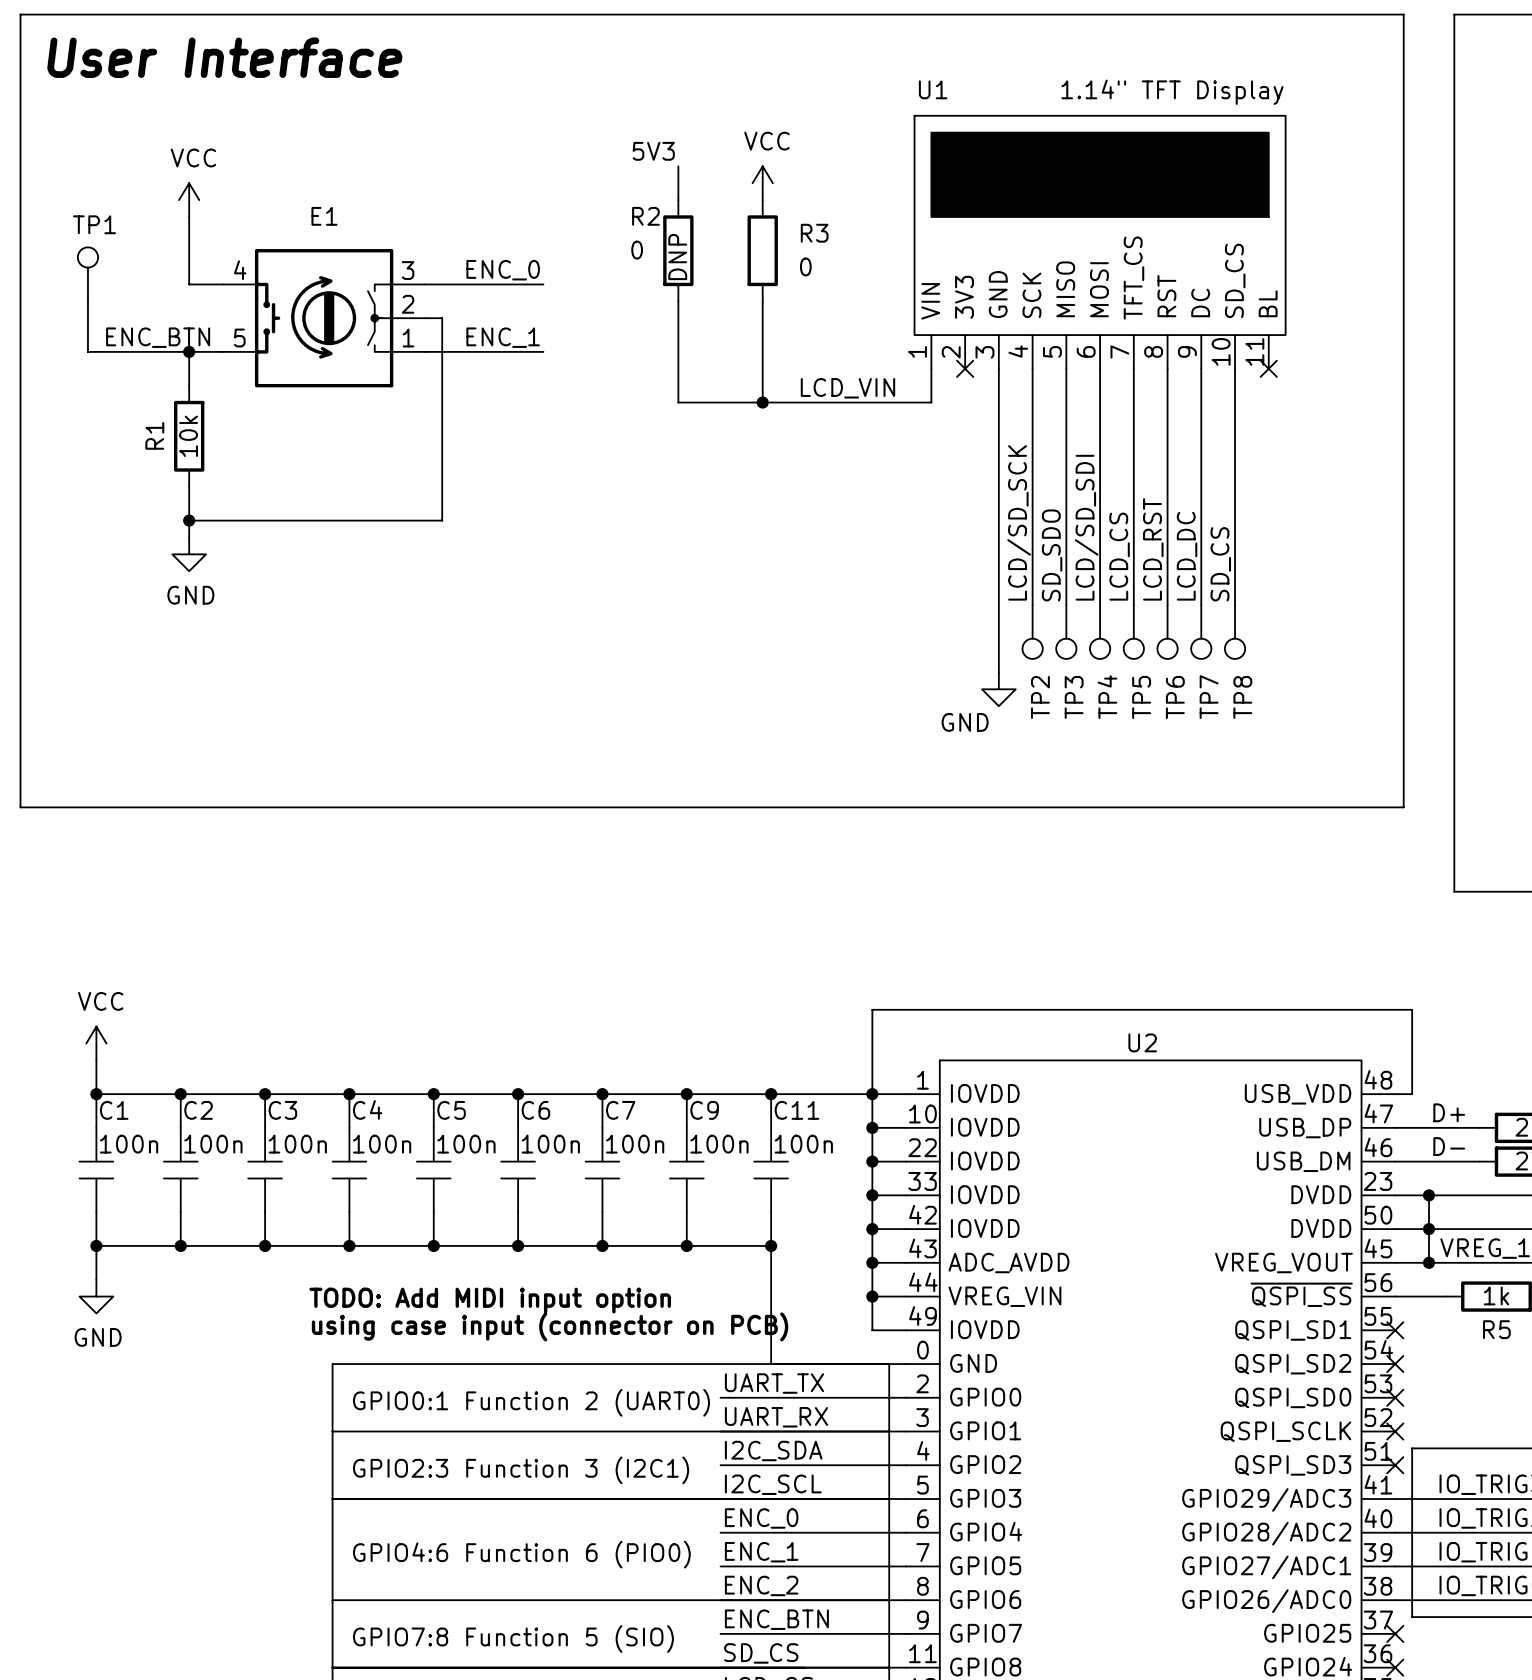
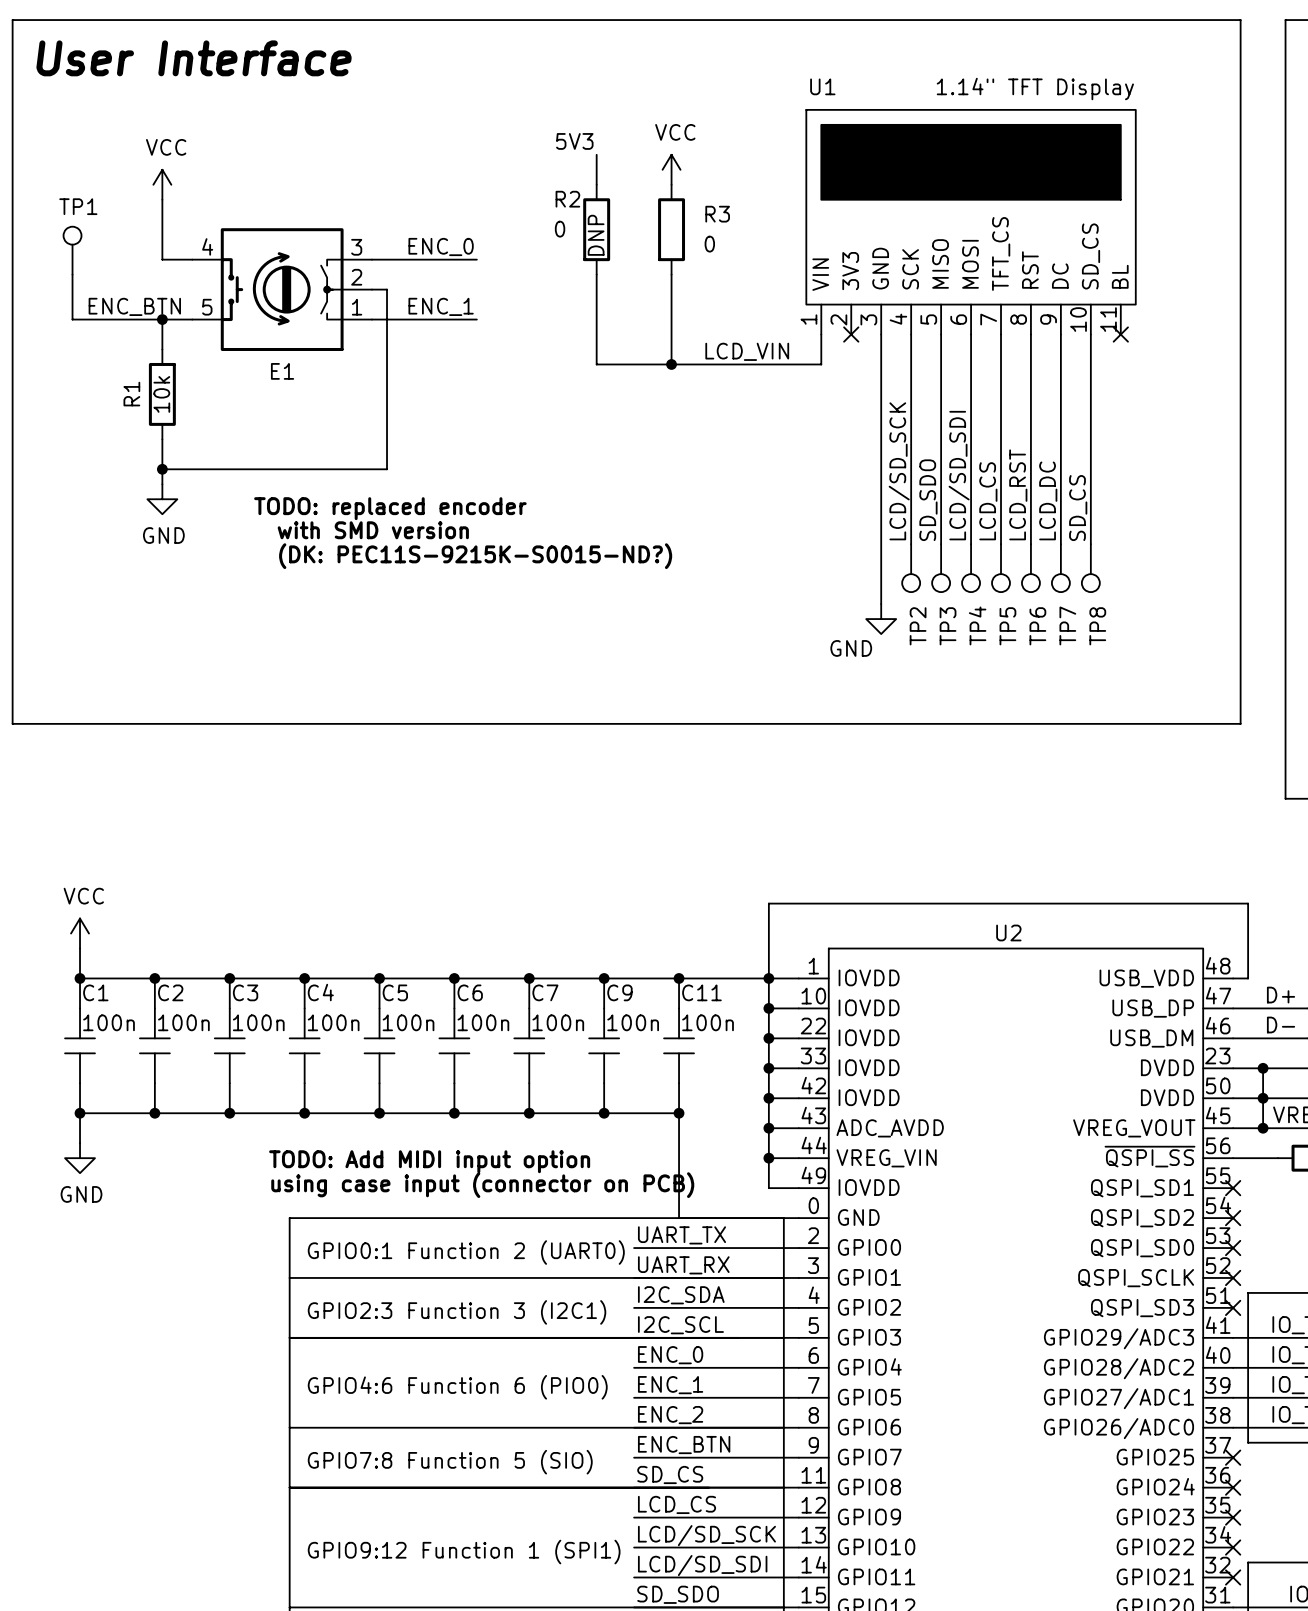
E1 name position: E1 (324, 216) -> E1 (282, 371)
text: none -> TODO: replaced encoder (390, 508)
text: none -> with SMD version (373, 530)
text: none -> (DK: PEC11S-9215K-S0015-ND?) (475, 556)

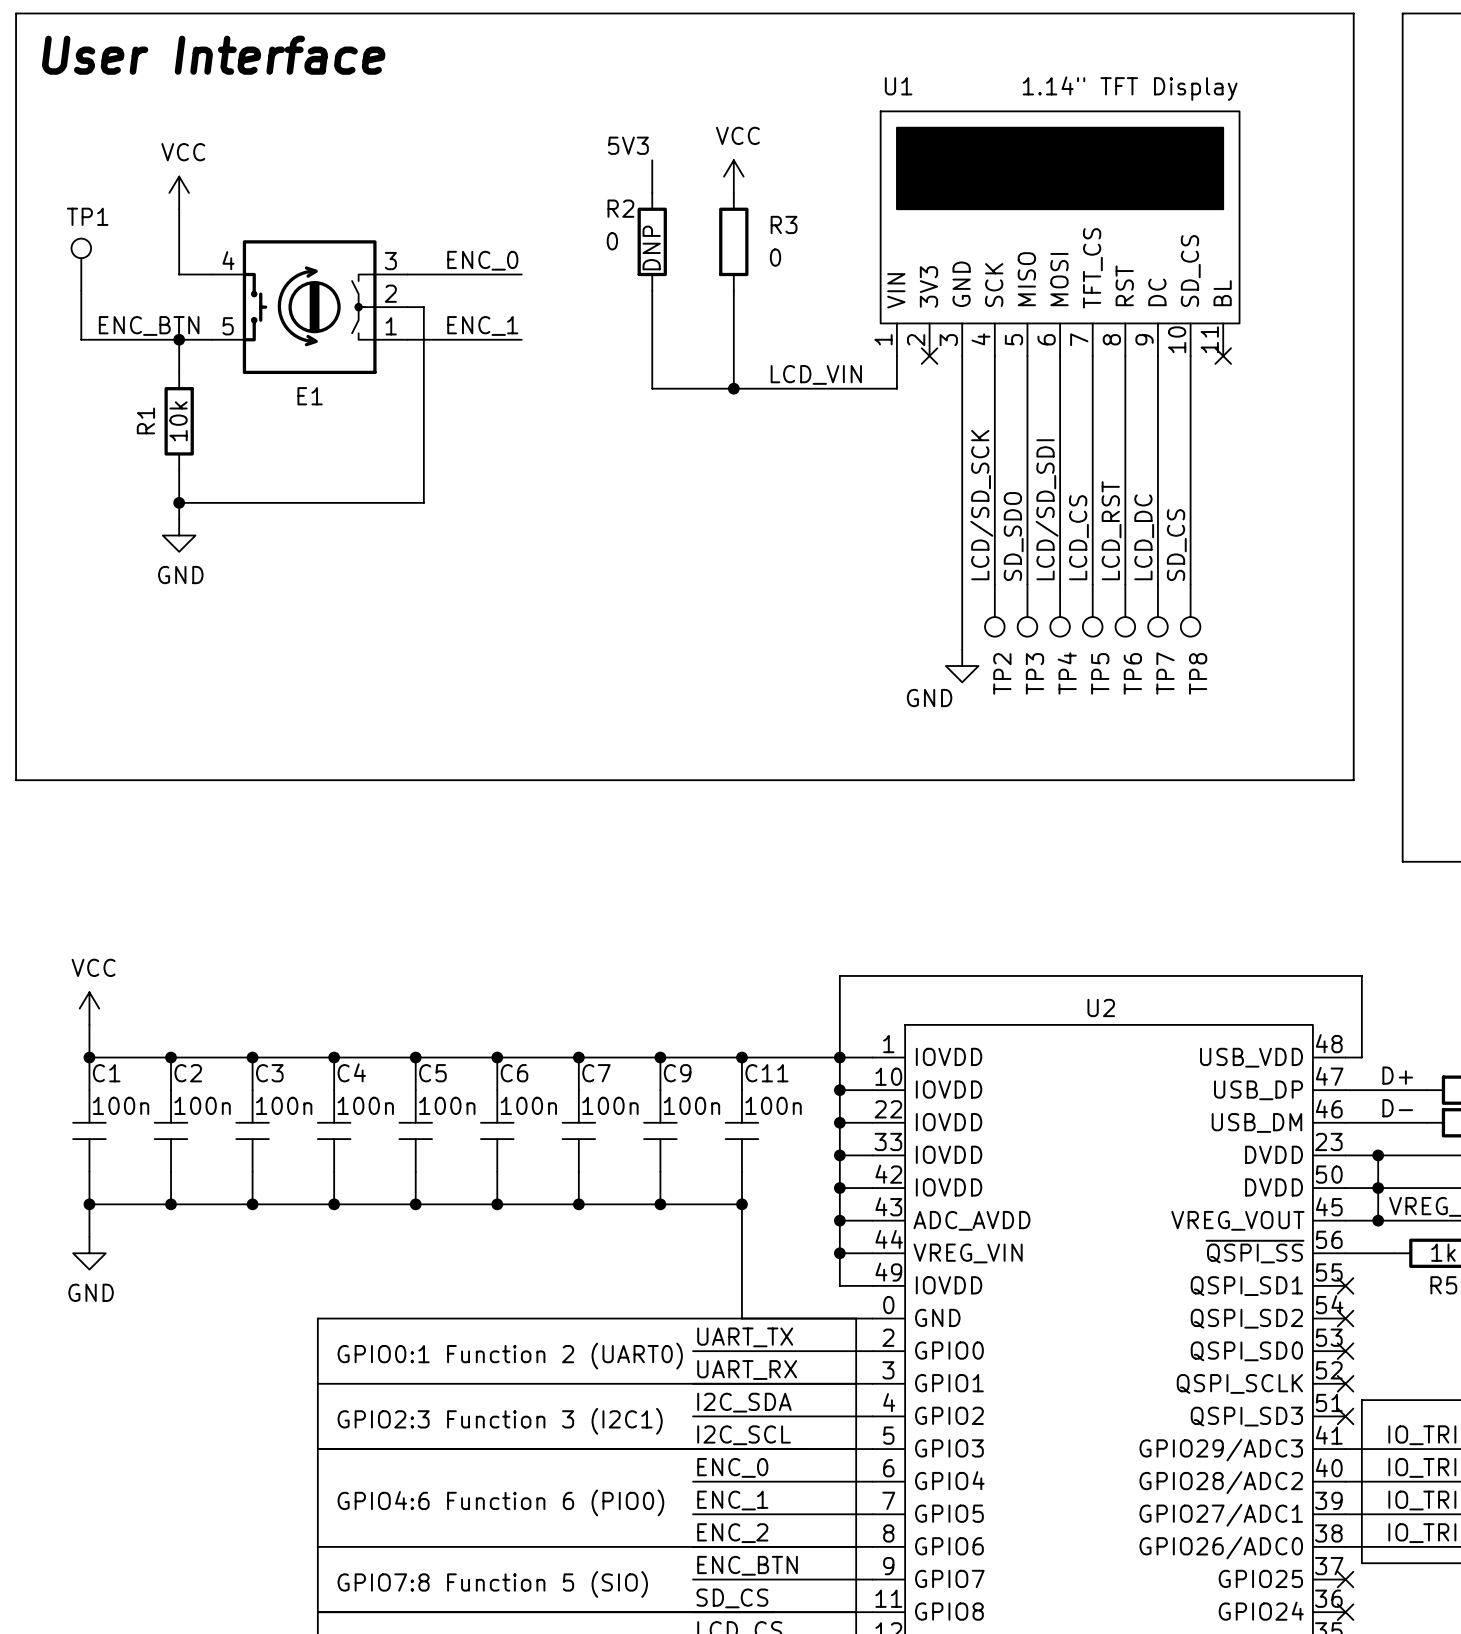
text: TODO: replaced encoder (390, 508) -> none
text: with SMD version (373, 530) -> none
text: (DK: PEC11S-9215K-S0015-ND?) (475, 556) -> none
text: TODO: Add MIDI input option (429, 1161) -> none
text: using case input (connector on PCB) (482, 1185) -> none

